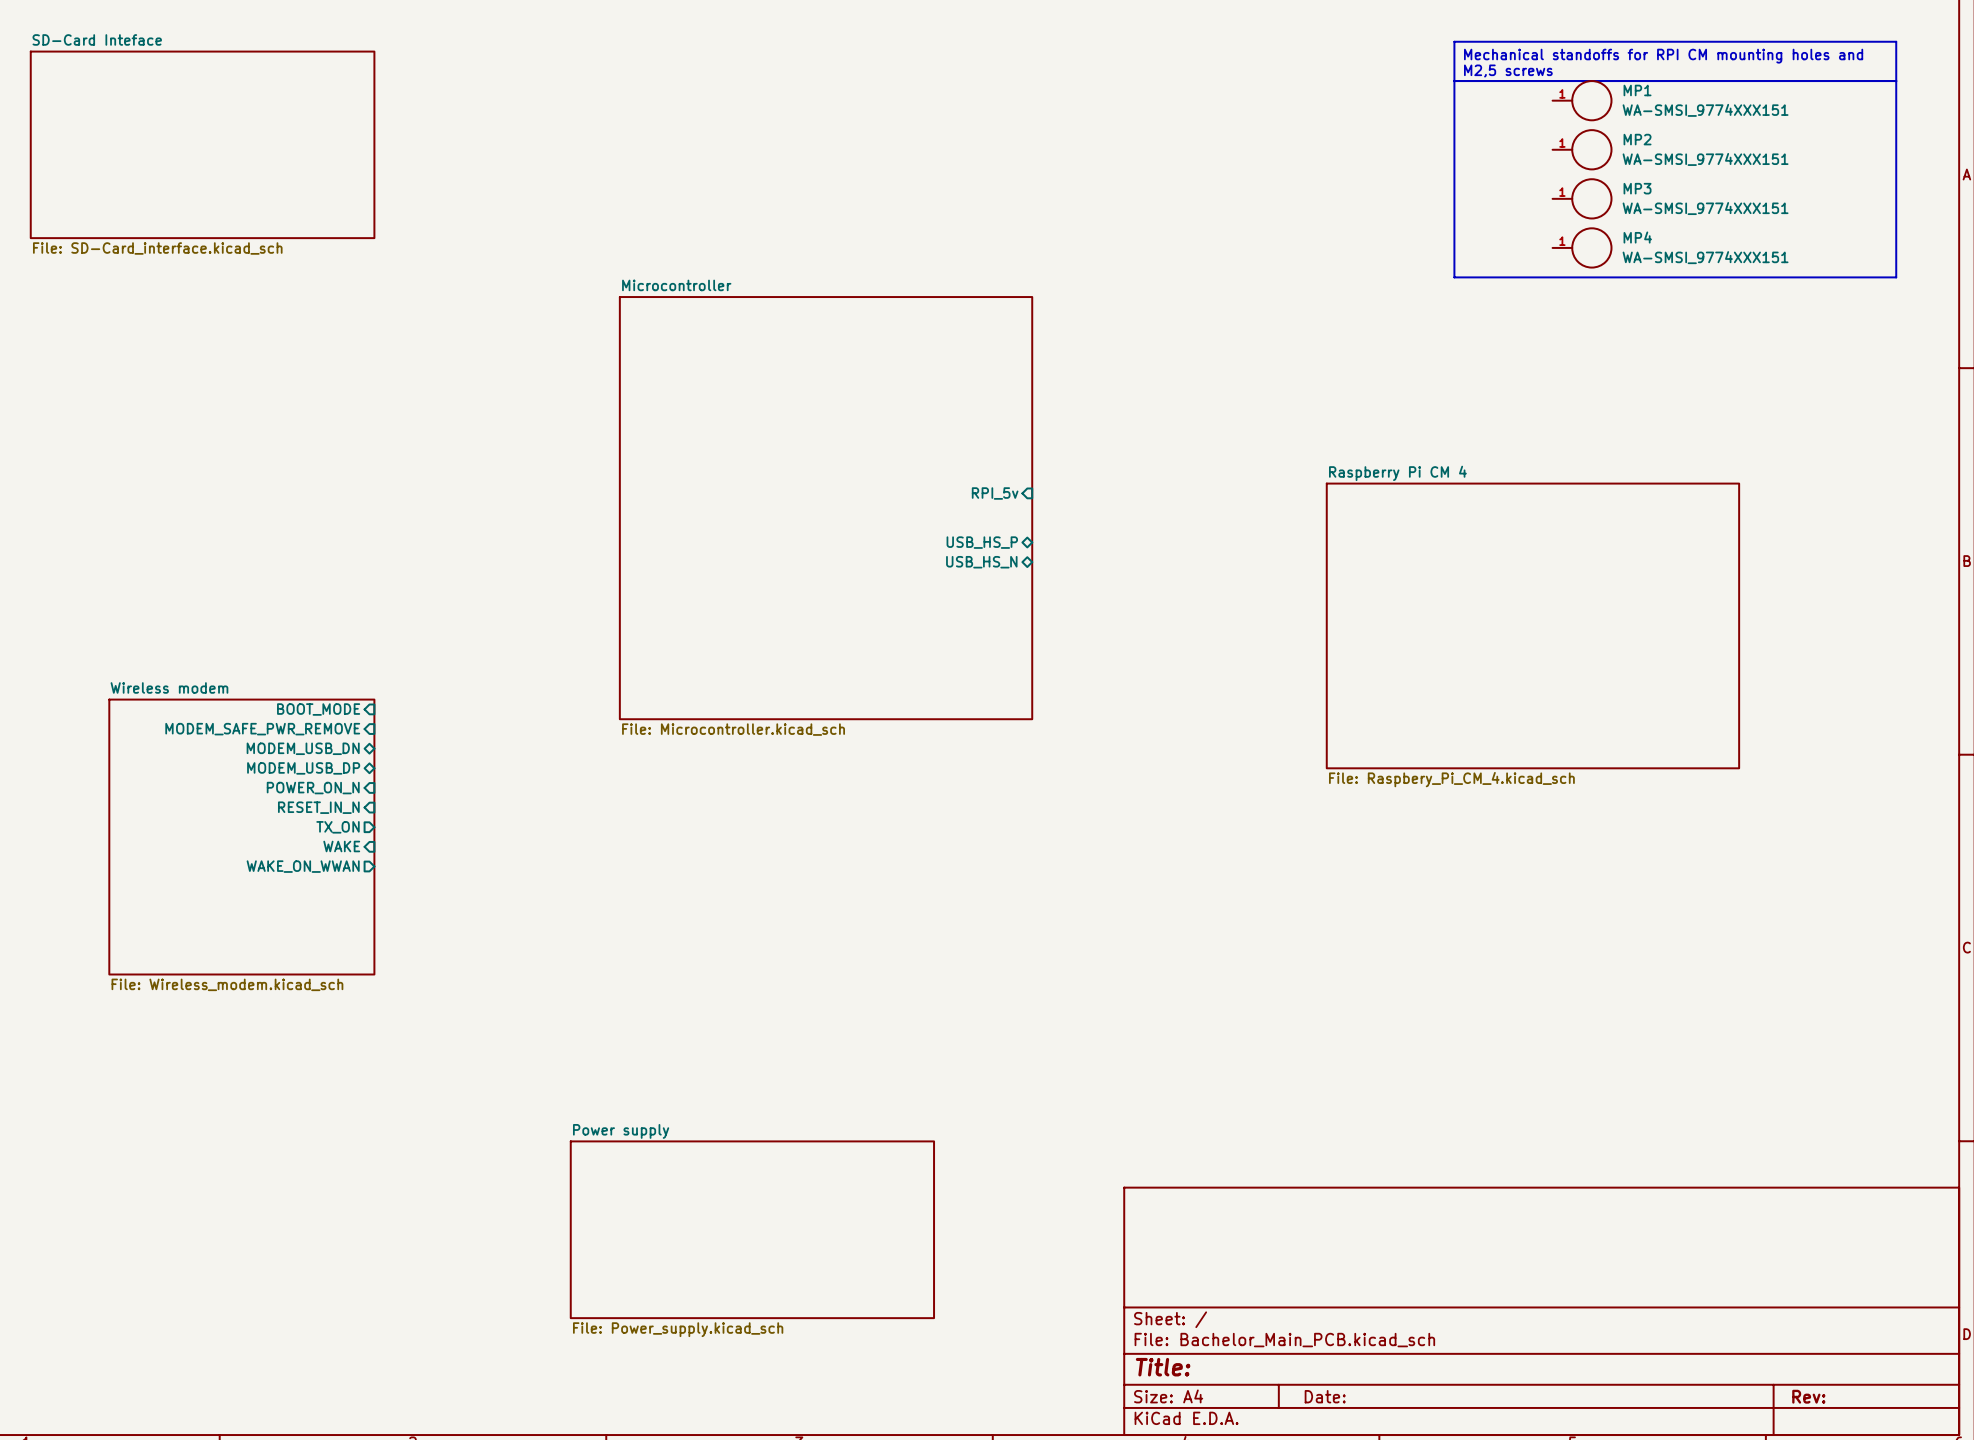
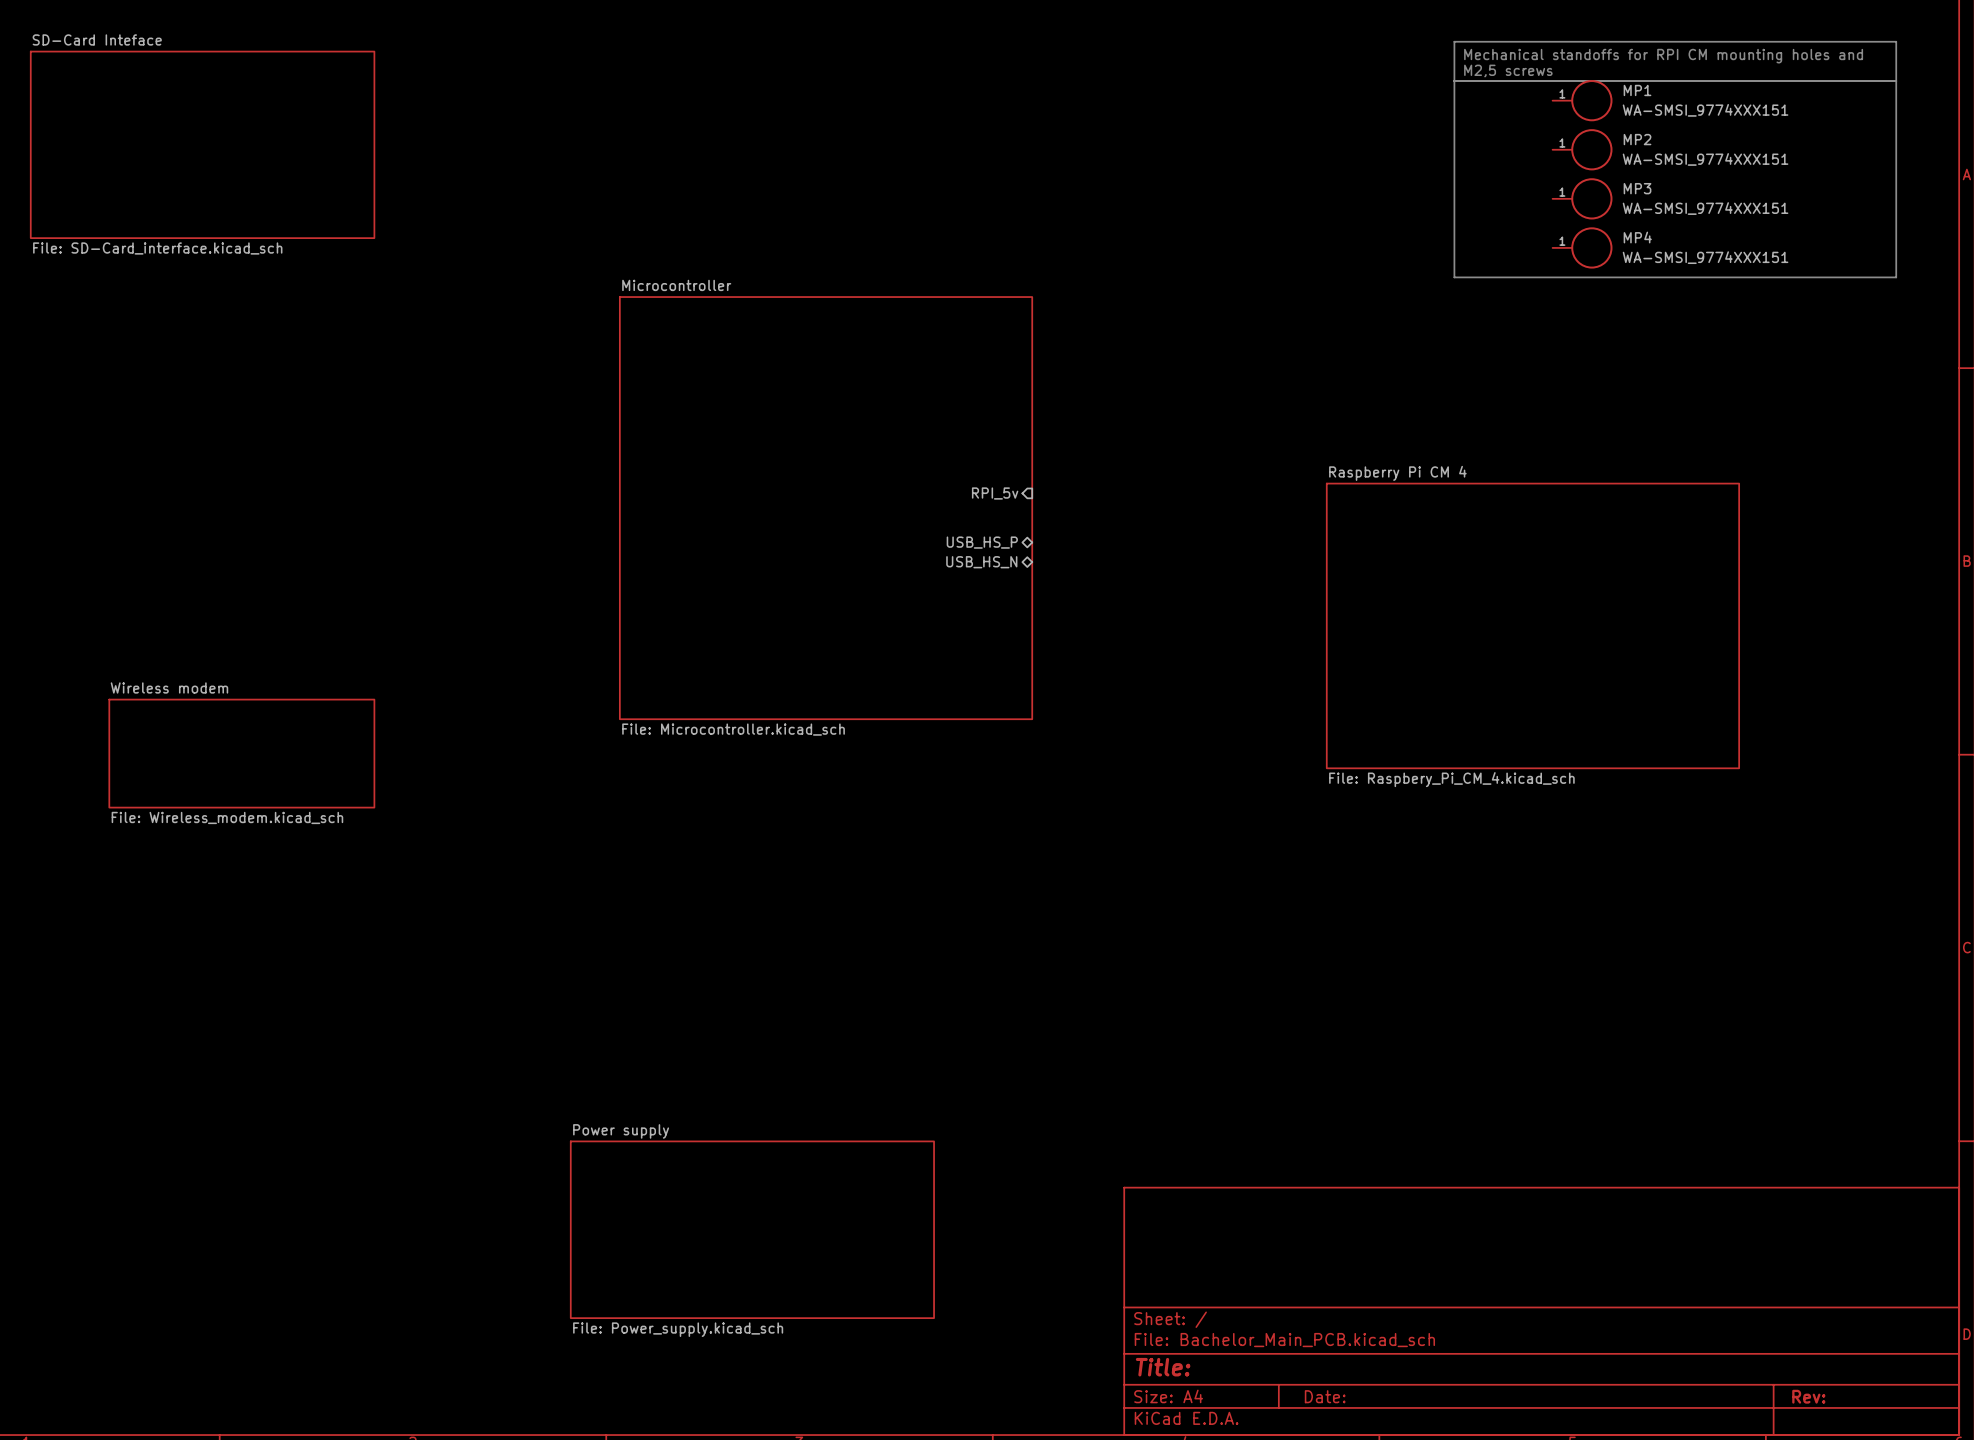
sheet pin: BOOT_MODE (318, 709) -> none
sheet pin: MODEM_SAFE_PWR_REMOVE (262, 729) -> none
sheet pin: MODEM_USB_DN (303, 748) -> none
sheet Wireless modem: none -> File: Wireless_modem.kicad_sch (241, 753)
sheet pin: MODEM_USB_DP (303, 768) -> none
sheet pin: POWER_ON_N (313, 788) -> none
sheet pin: RESET_IN_N (318, 807) -> none
sheet pin: TX_ON (338, 827) -> none
sheet Wireless modem: File: Wireless_modem.kicad_sch (241, 837) -> none
sheet pin: WAKE (341, 846) -> none
sheet pin: WAKE_ON_WWAN (303, 866) -> none

